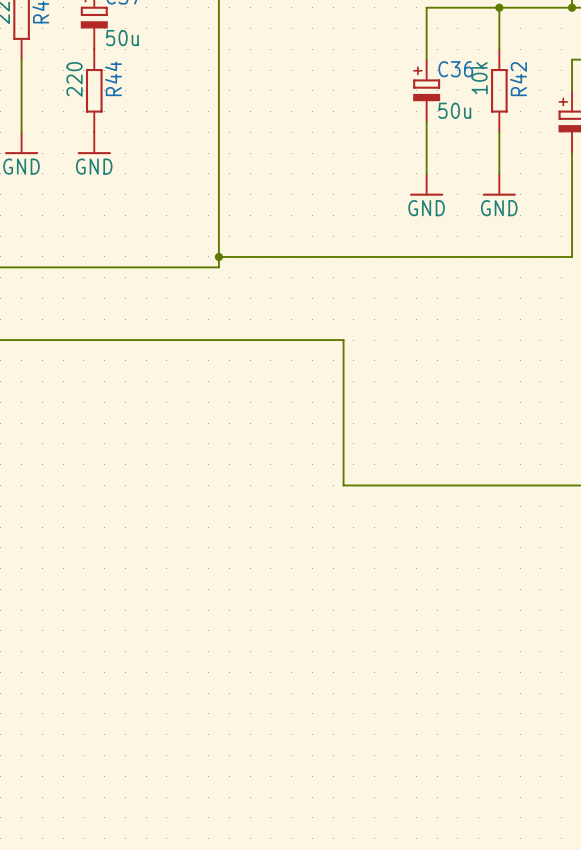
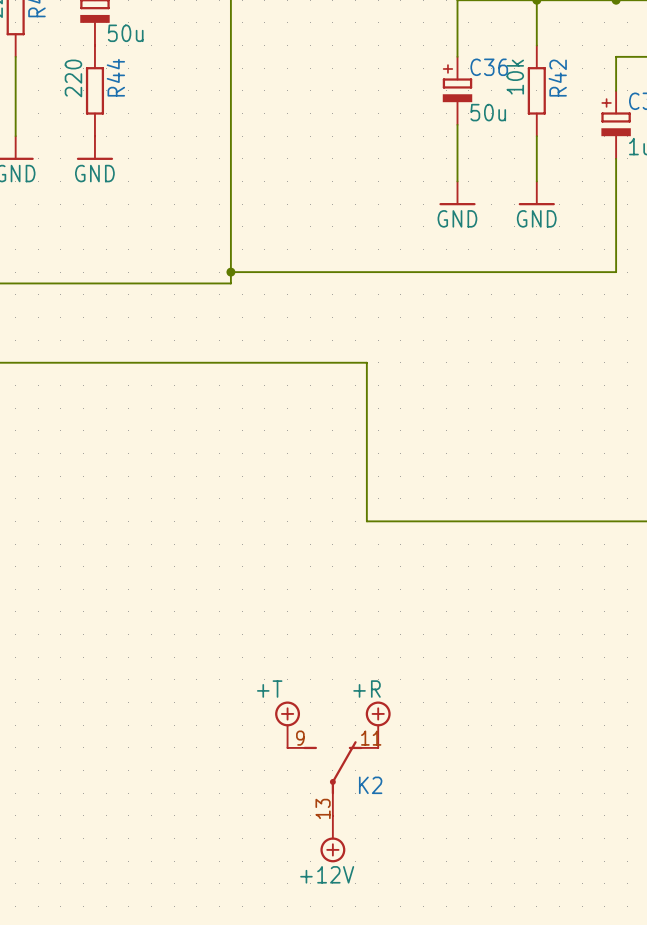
power symbol: none -> +T (287, 724)
power symbol: none -> +R (378, 724)
K2: none -> (332, 778)
power symbol: none -> +12V (332, 839)

